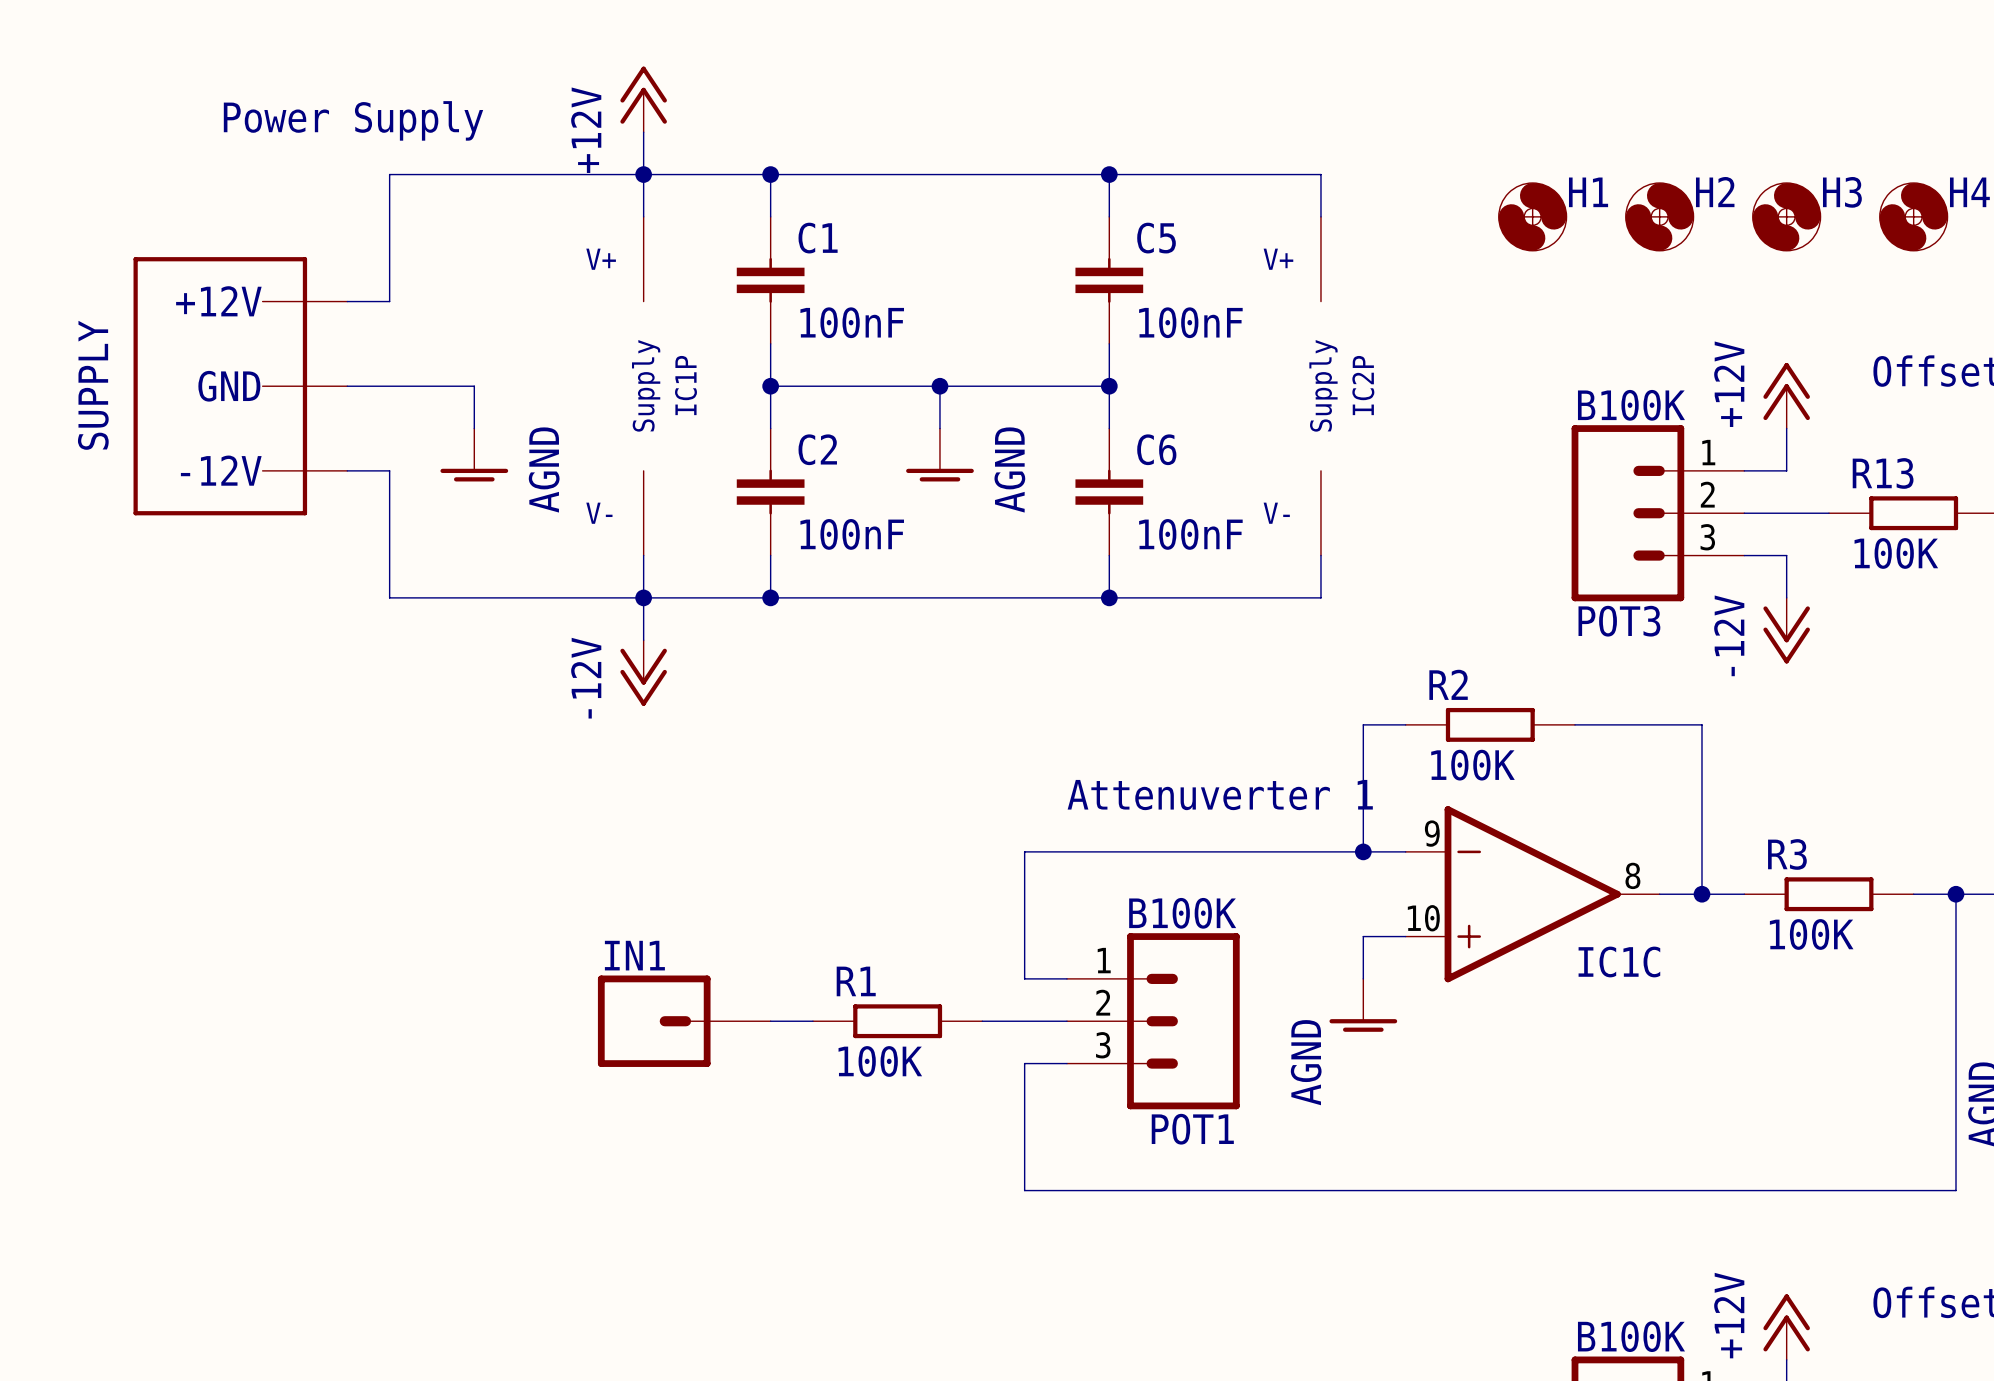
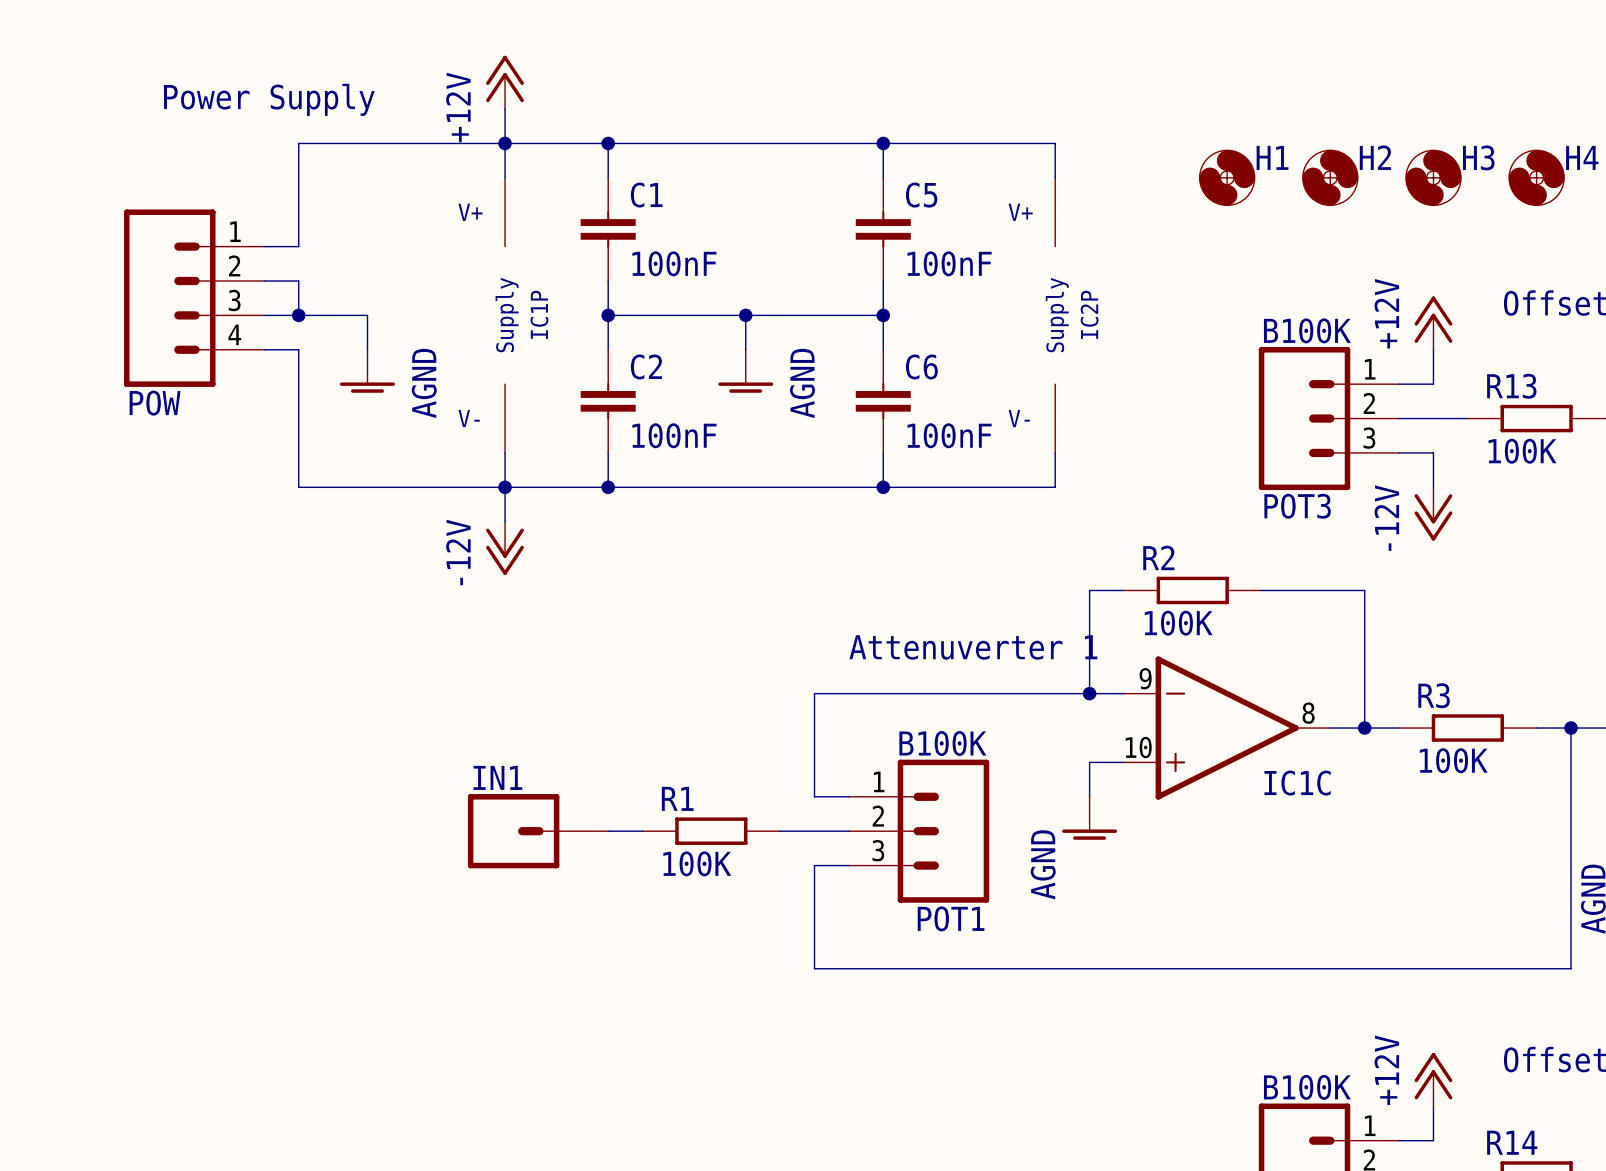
wire: none -> (264, 281) (298, 281) (298, 315)
POW: none -> (194, 298)
part: (240, 386) -> none
junction: none -> (298, 315)
wire: (347, 470) (389, 470) -> (264, 349) (298, 349) (298, 384)

